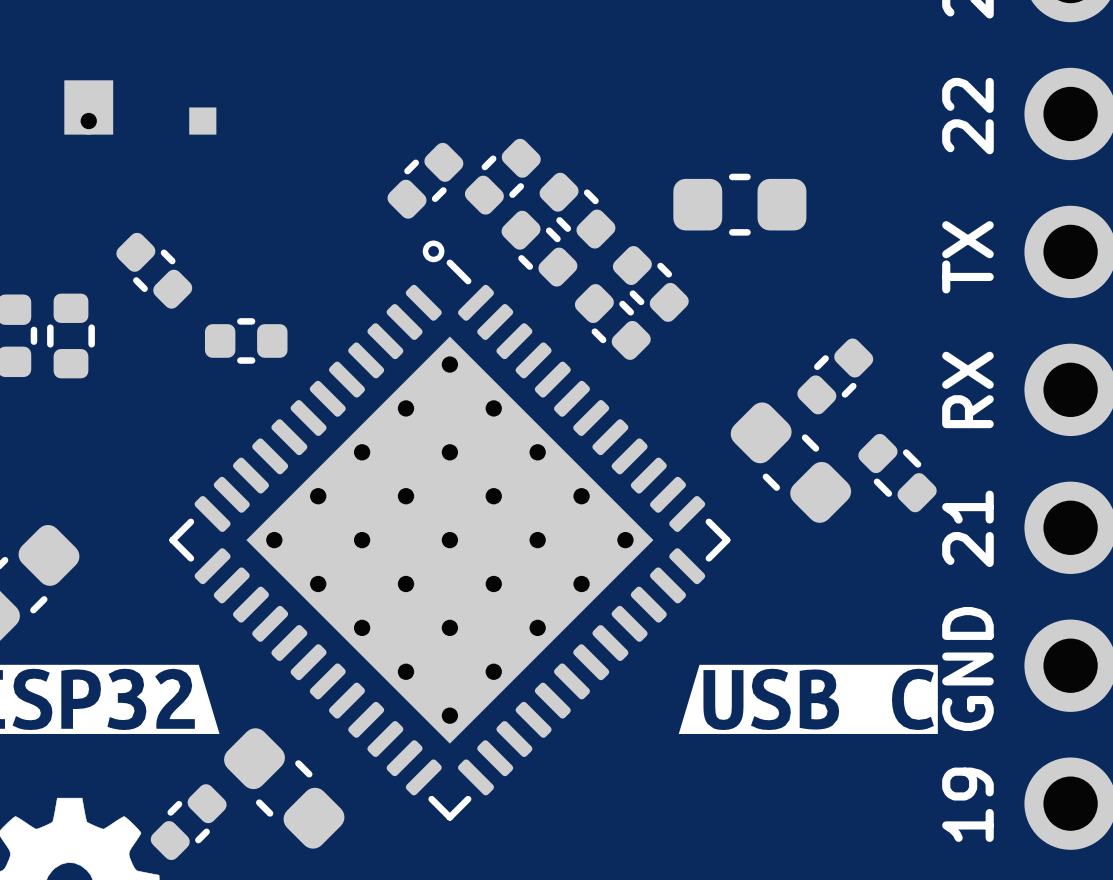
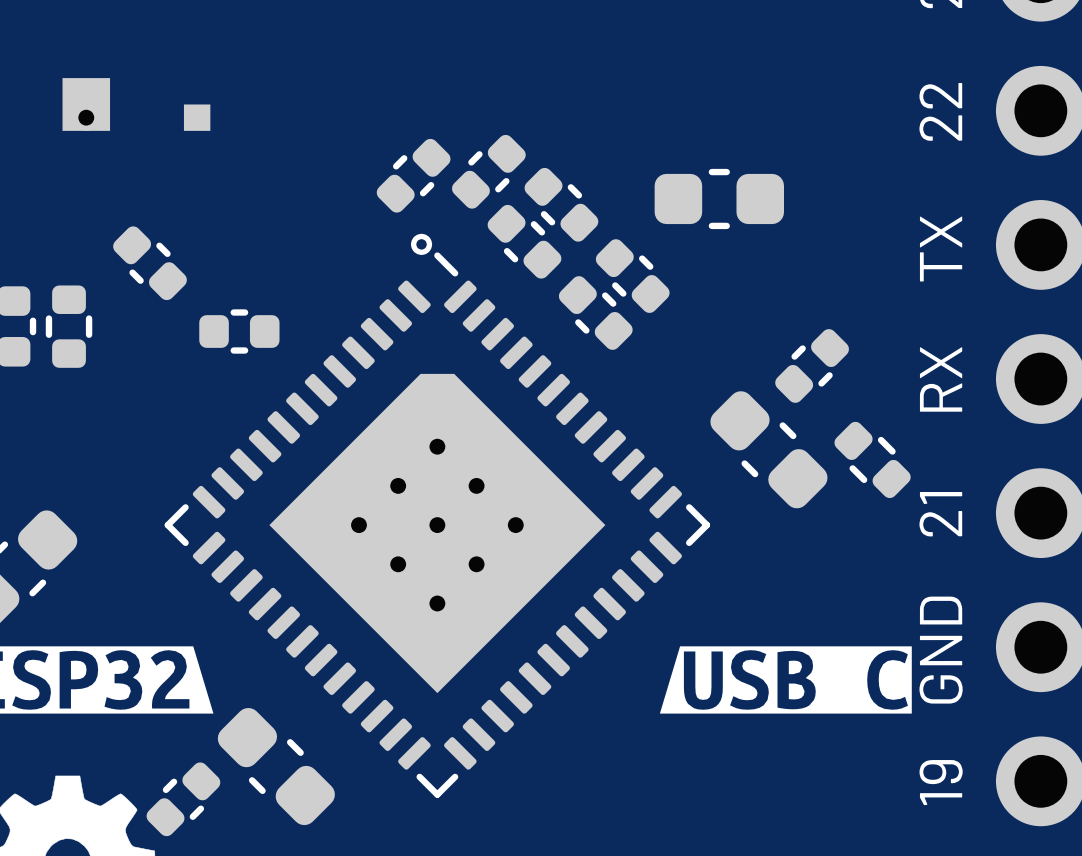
part footprint: [169, 259, 731, 821] -> [164, 252, 711, 798]

